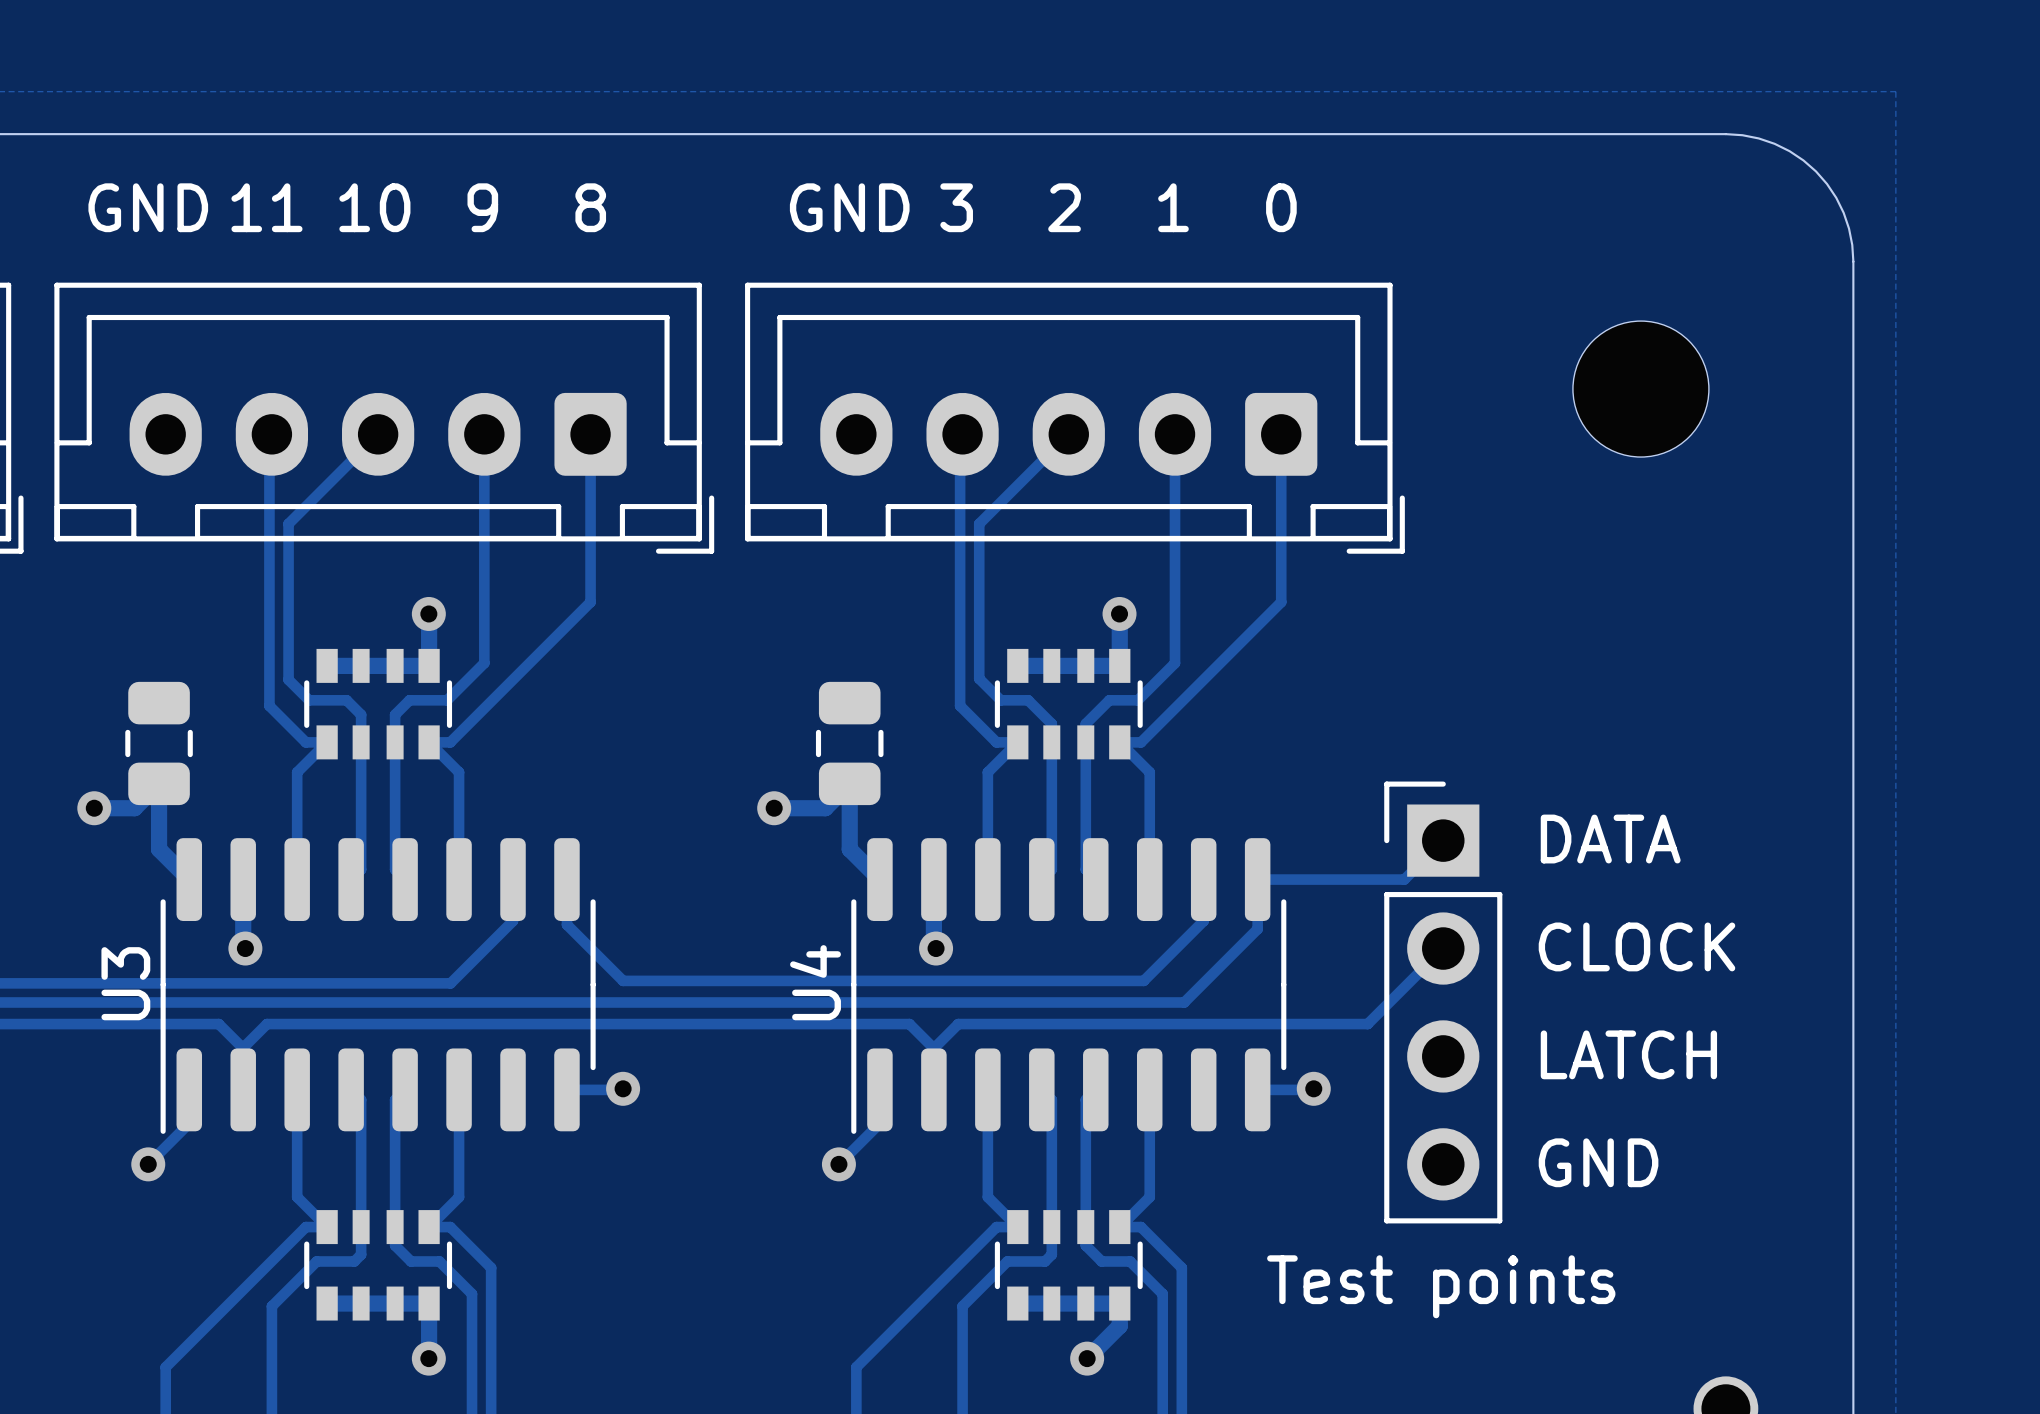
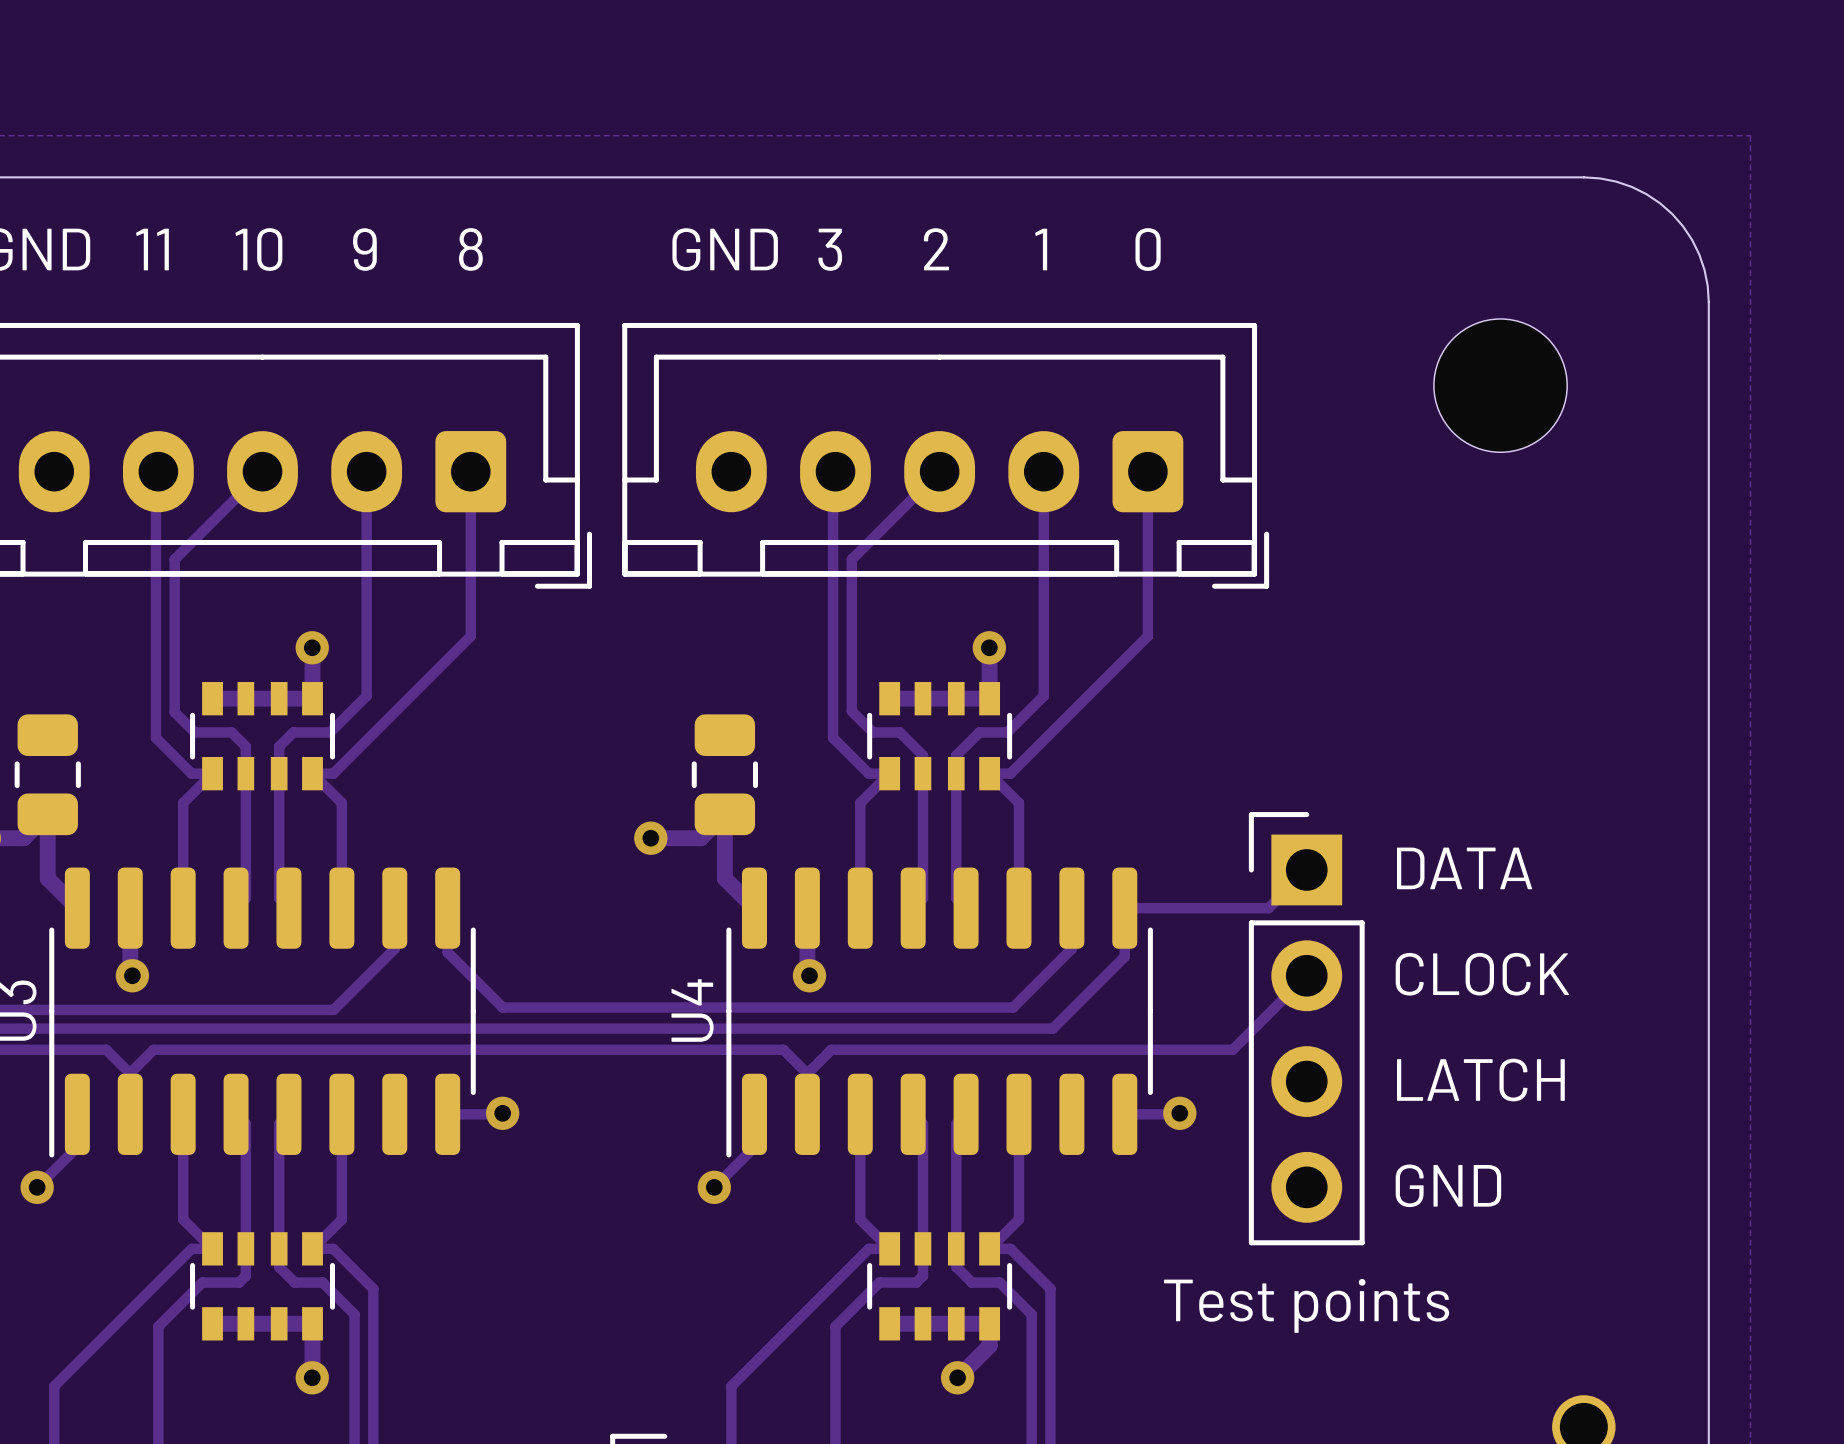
part position: (1640, 389) -> (1500, 385)

